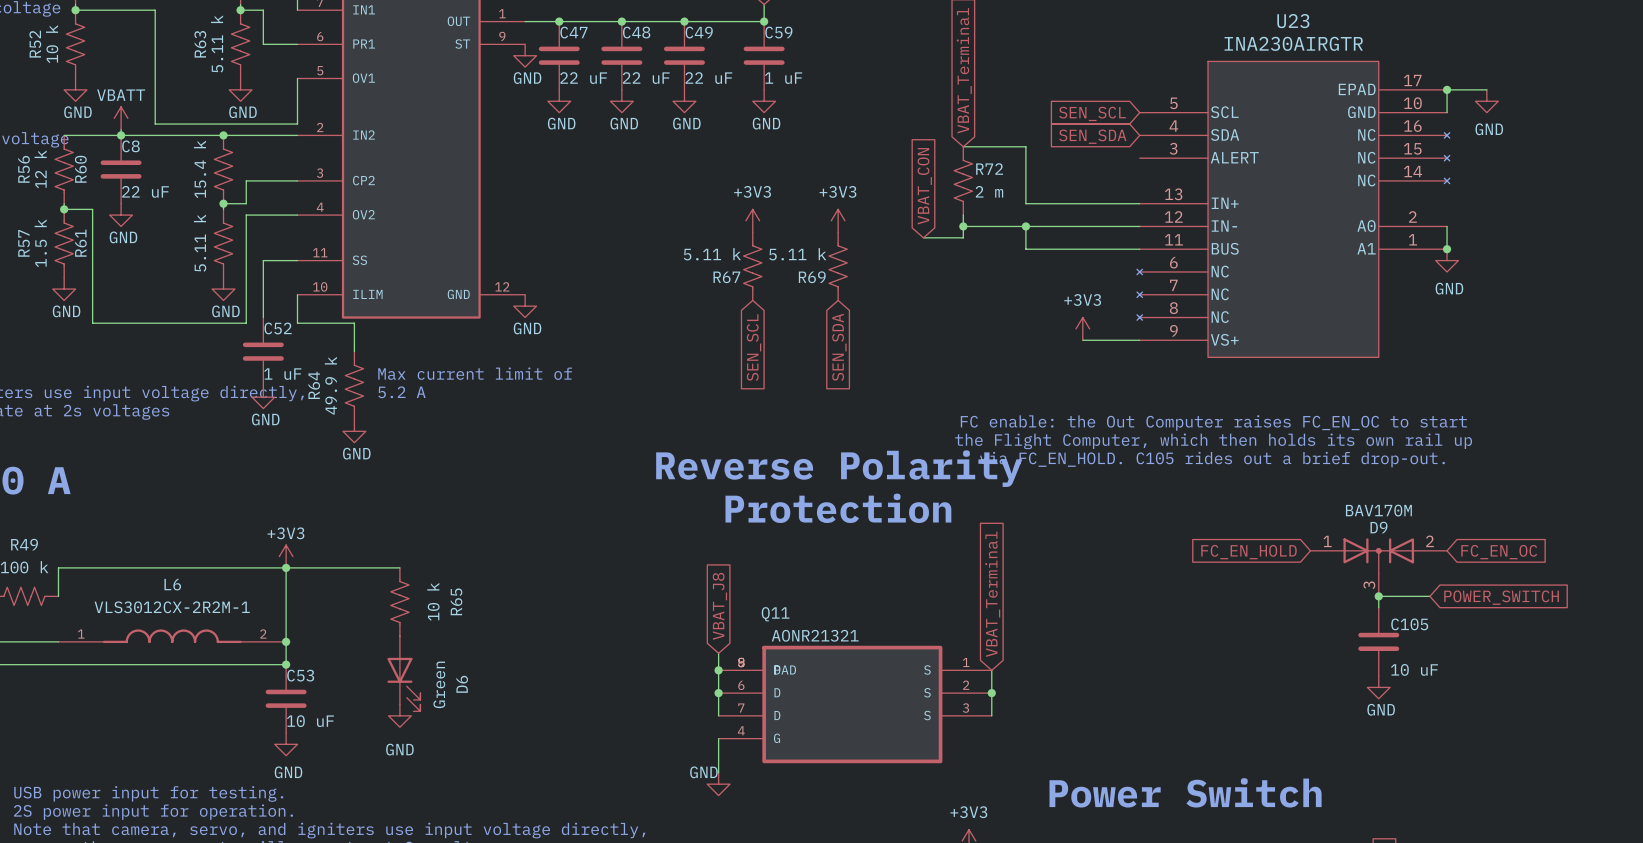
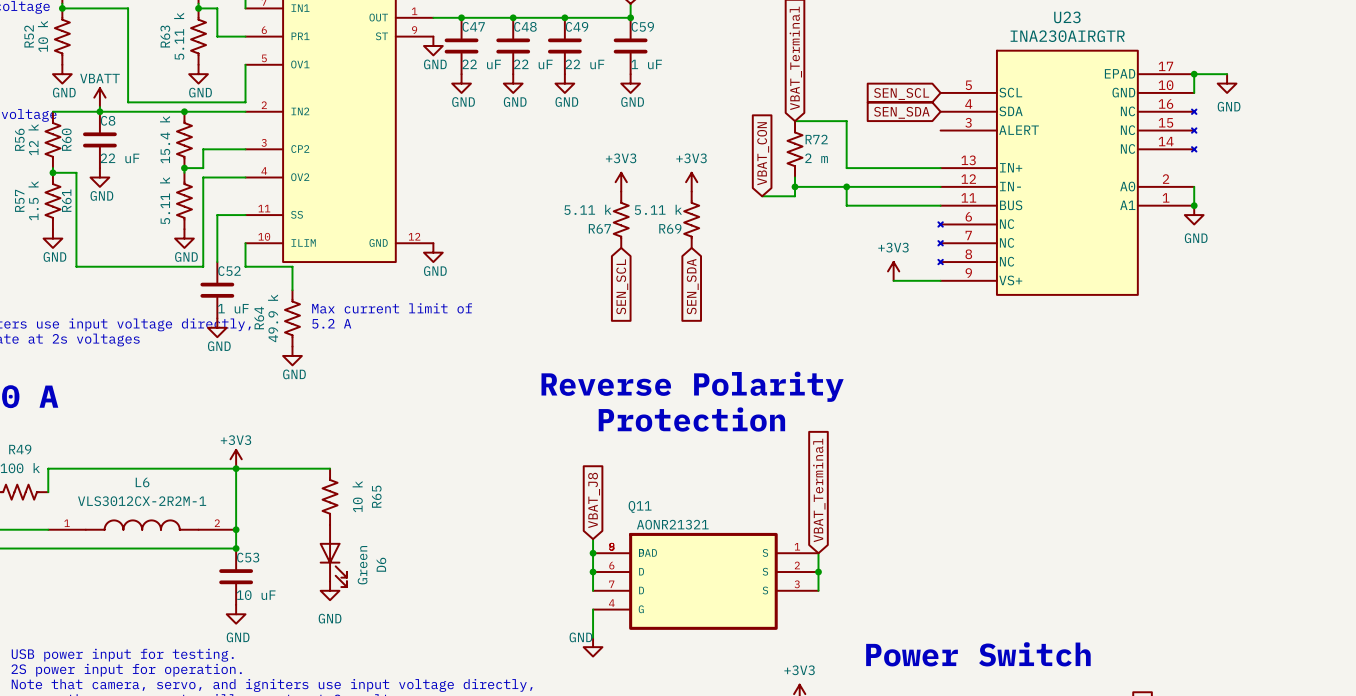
text: FC enable: the Out Computer raises FC_EN_OC to start (1213, 422) -> none
text: the Flight Computer, which then holds its own rail up (1213, 441) -> none
text: via FC_EN_HOLD. C105 rides out a brief drop-out. (1212, 459) -> none
global label: FC_EN_HOLD (1249, 552) -> none
global label: FC_EN_OC (1499, 552) -> none
D9: BAV170M (1378, 567) -> none
junction: (1378, 596) -> none
wire: (1429, 596) (1378, 596) (1378, 607) -> none
global label: POWER_SWITCH (1501, 597) -> none
C105: 10 uF (1378, 641) -> none
power symbol: GND (1378, 687) -> none

